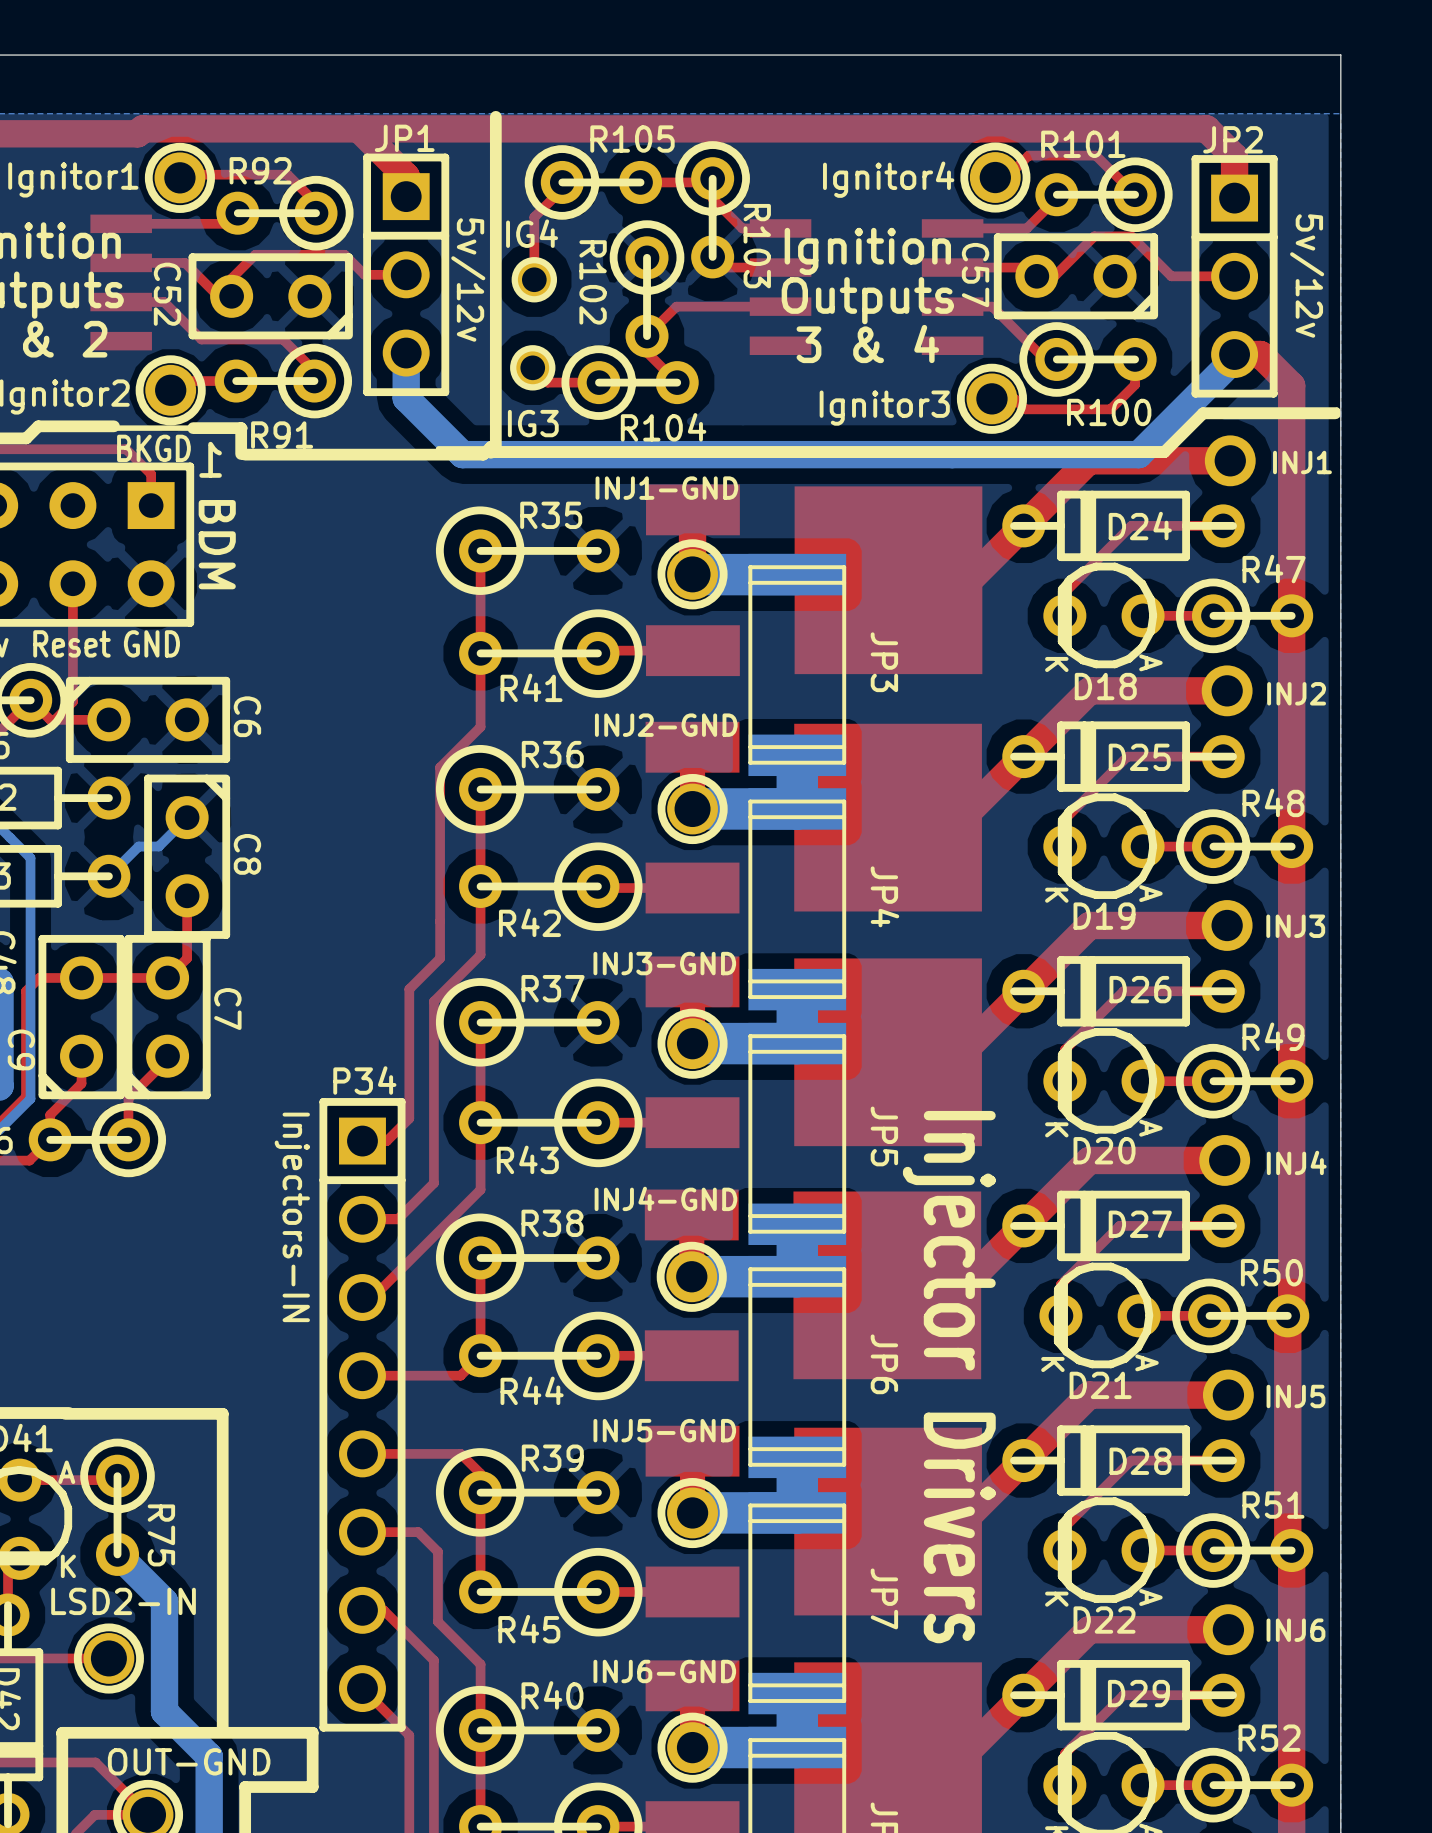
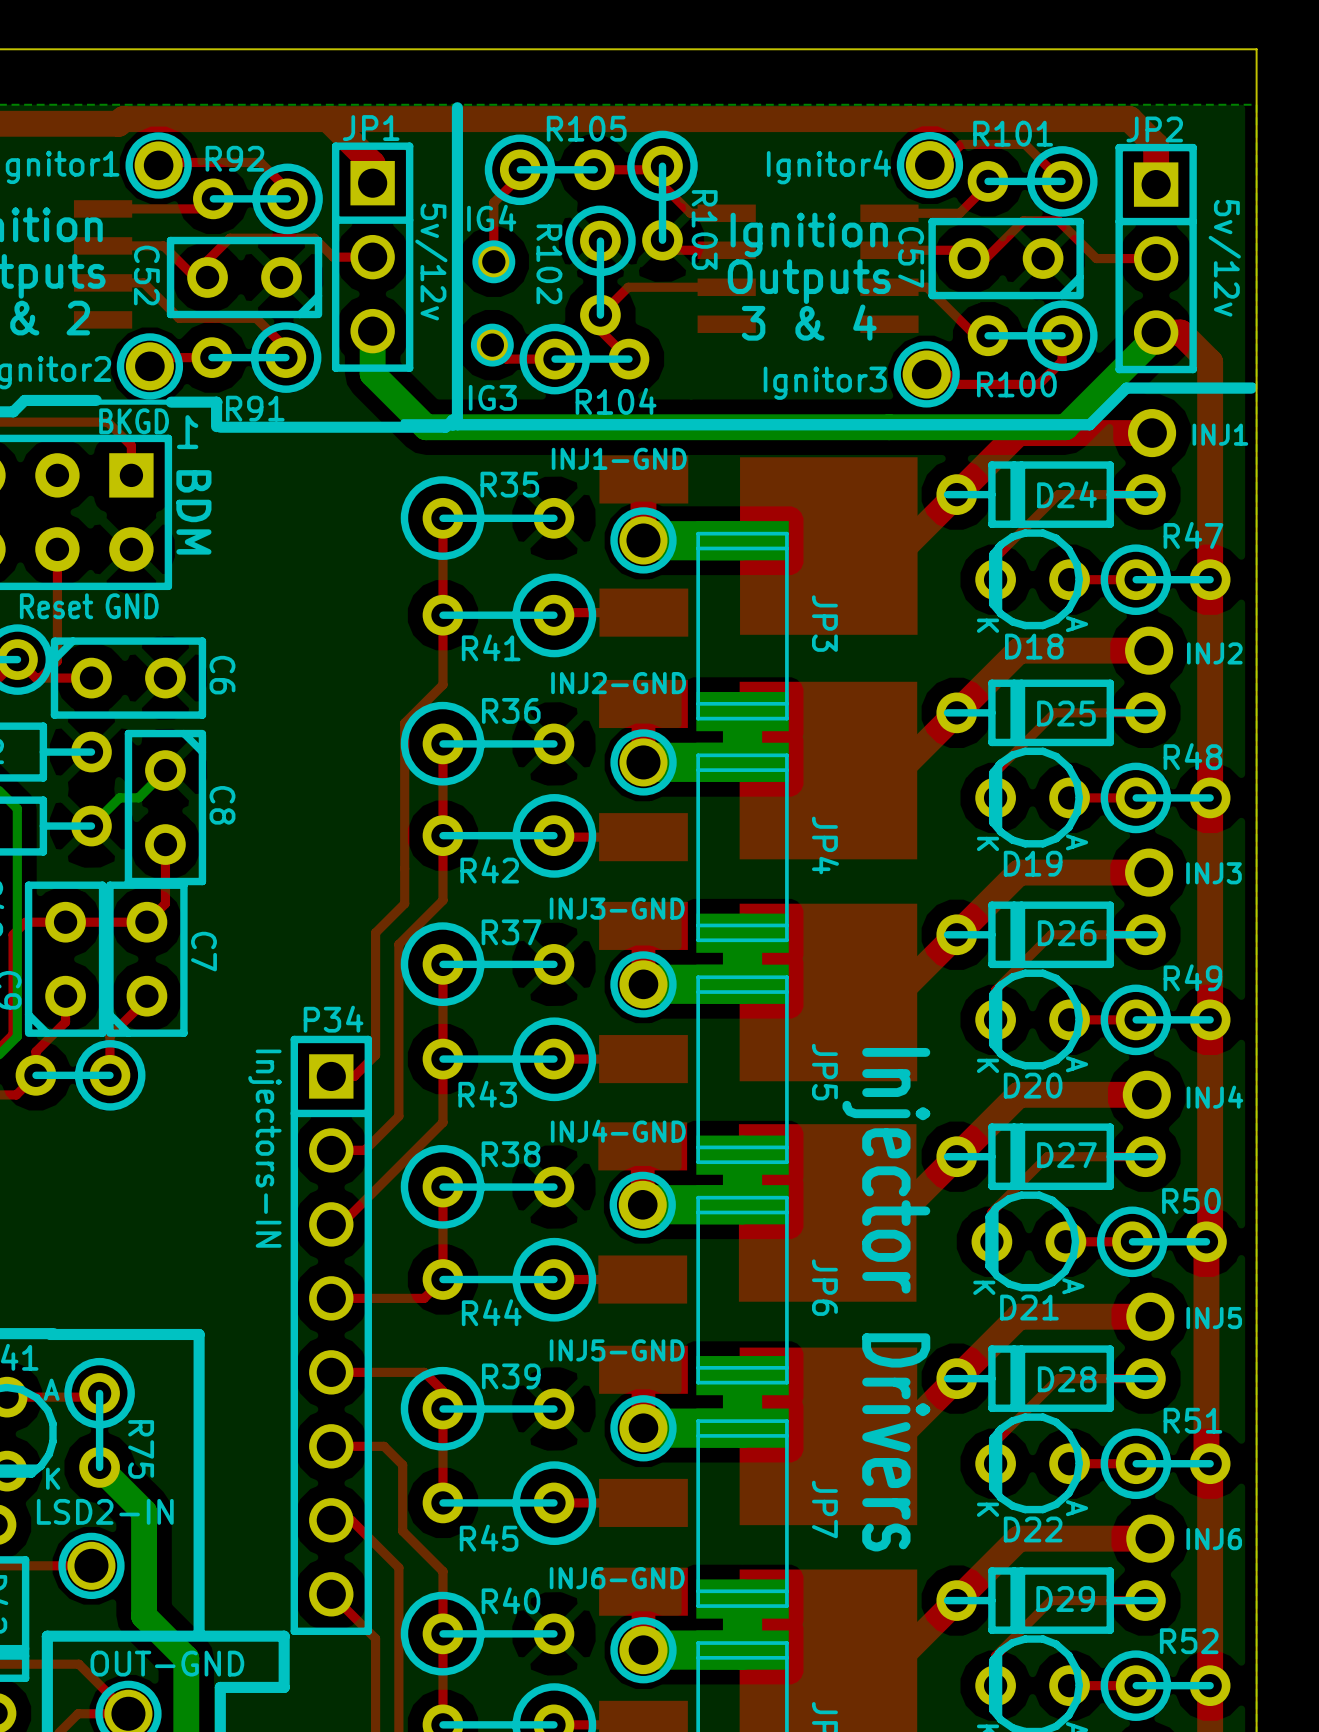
R100 rotation: 0° (1087, 359) -> 180° (1032, 335)

